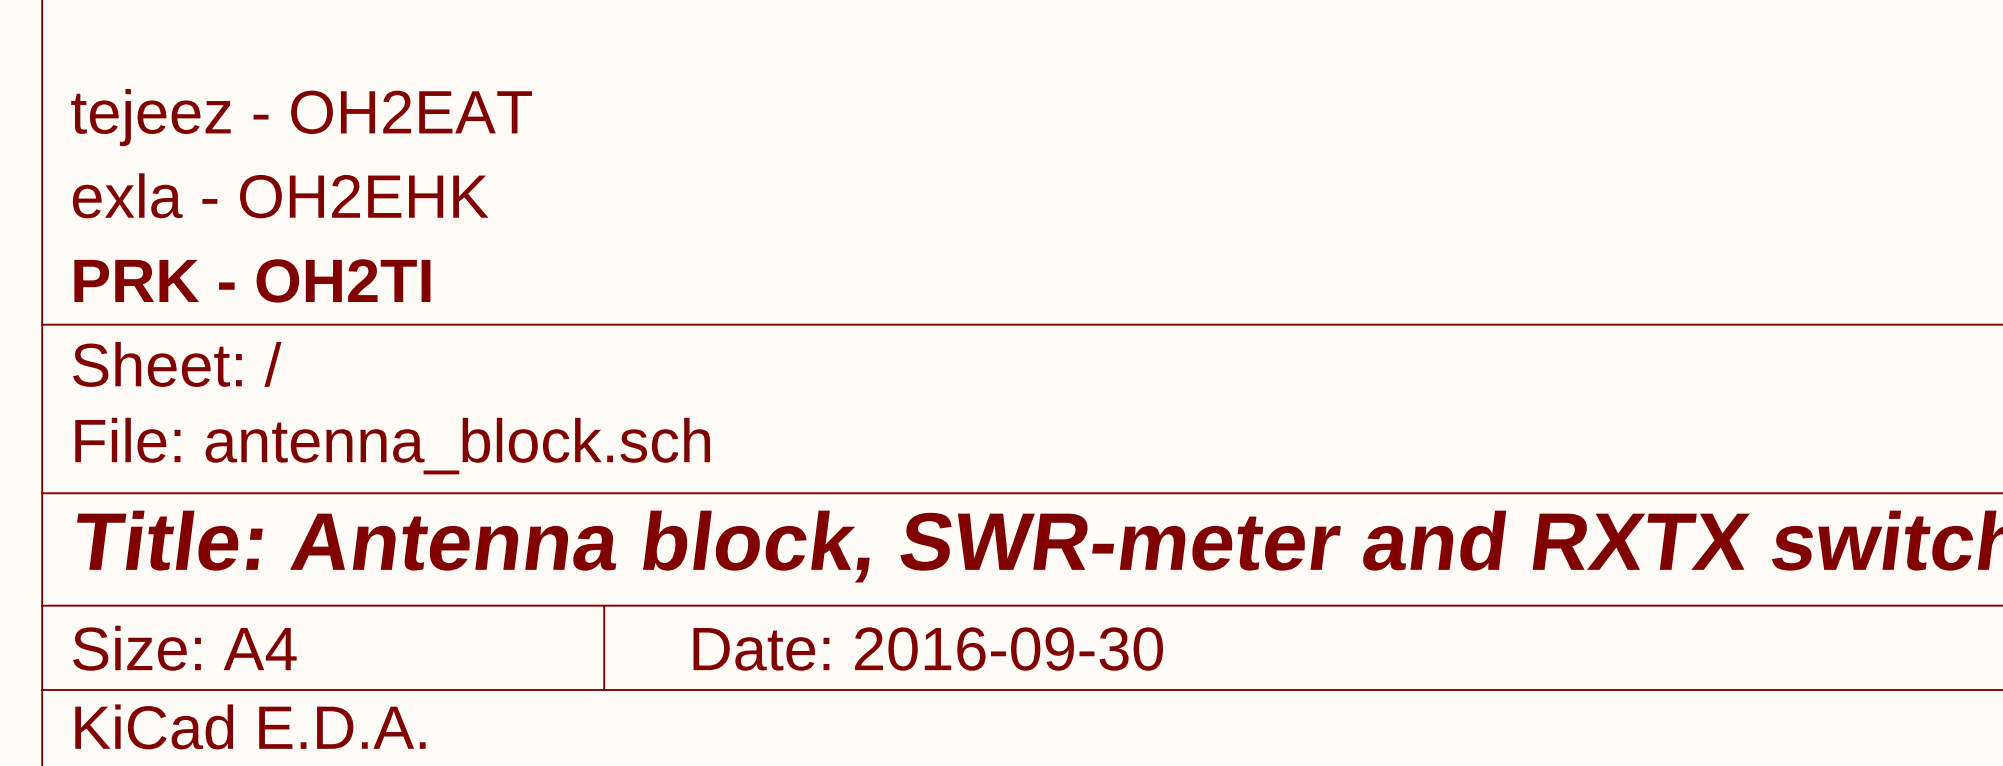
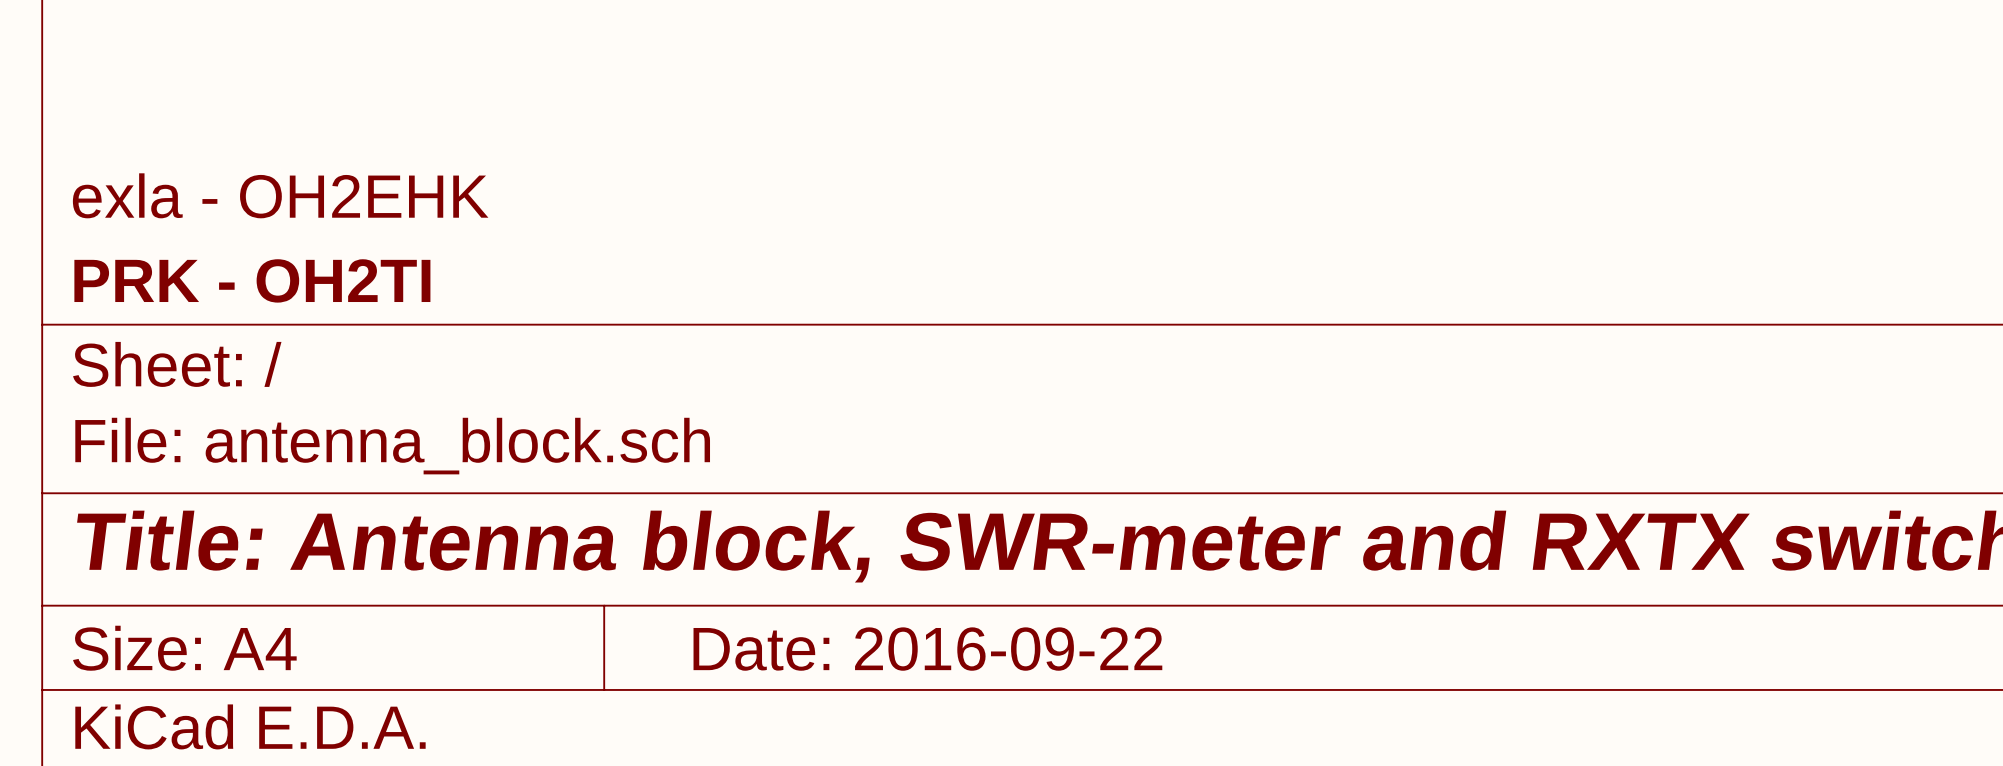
title block: tejeez - OH2EAT (301, 117) -> none
title block: Date: 2016-09-30 (928, 649) -> Date: 2016-09-22 (927, 649)

